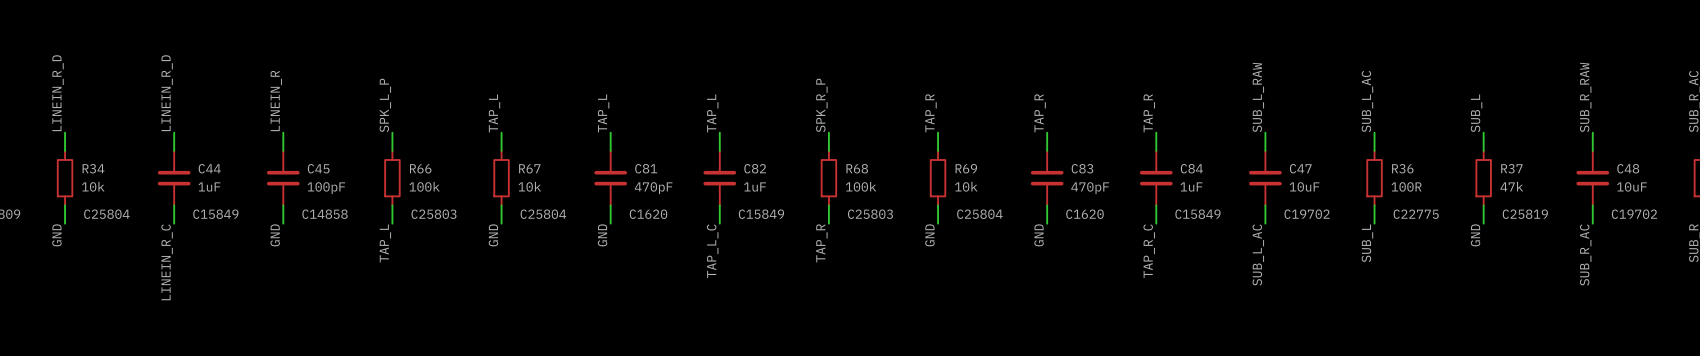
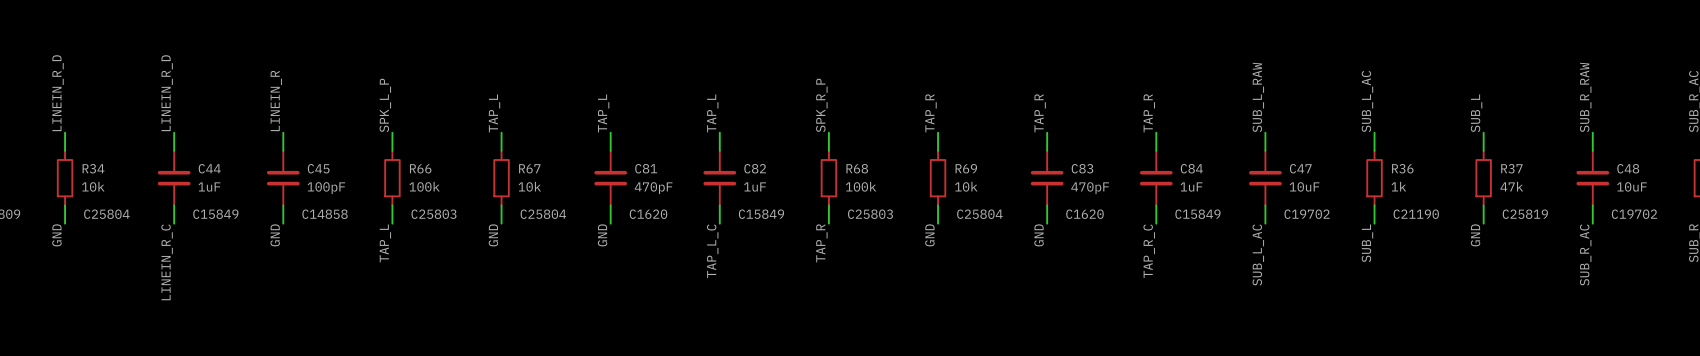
R36 value: 100R (1406, 186) -> 1k (1398, 186)
R36 text: C22775 (1416, 214) -> C21190 (1416, 214)

